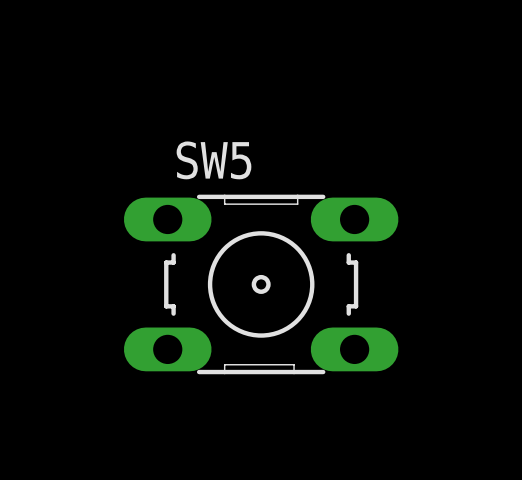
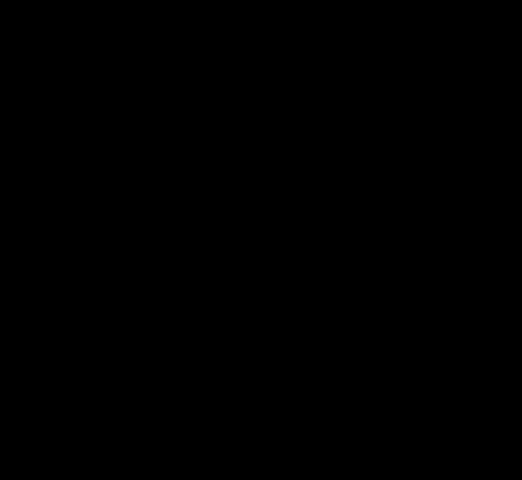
SW5: (261, 284) -> none

